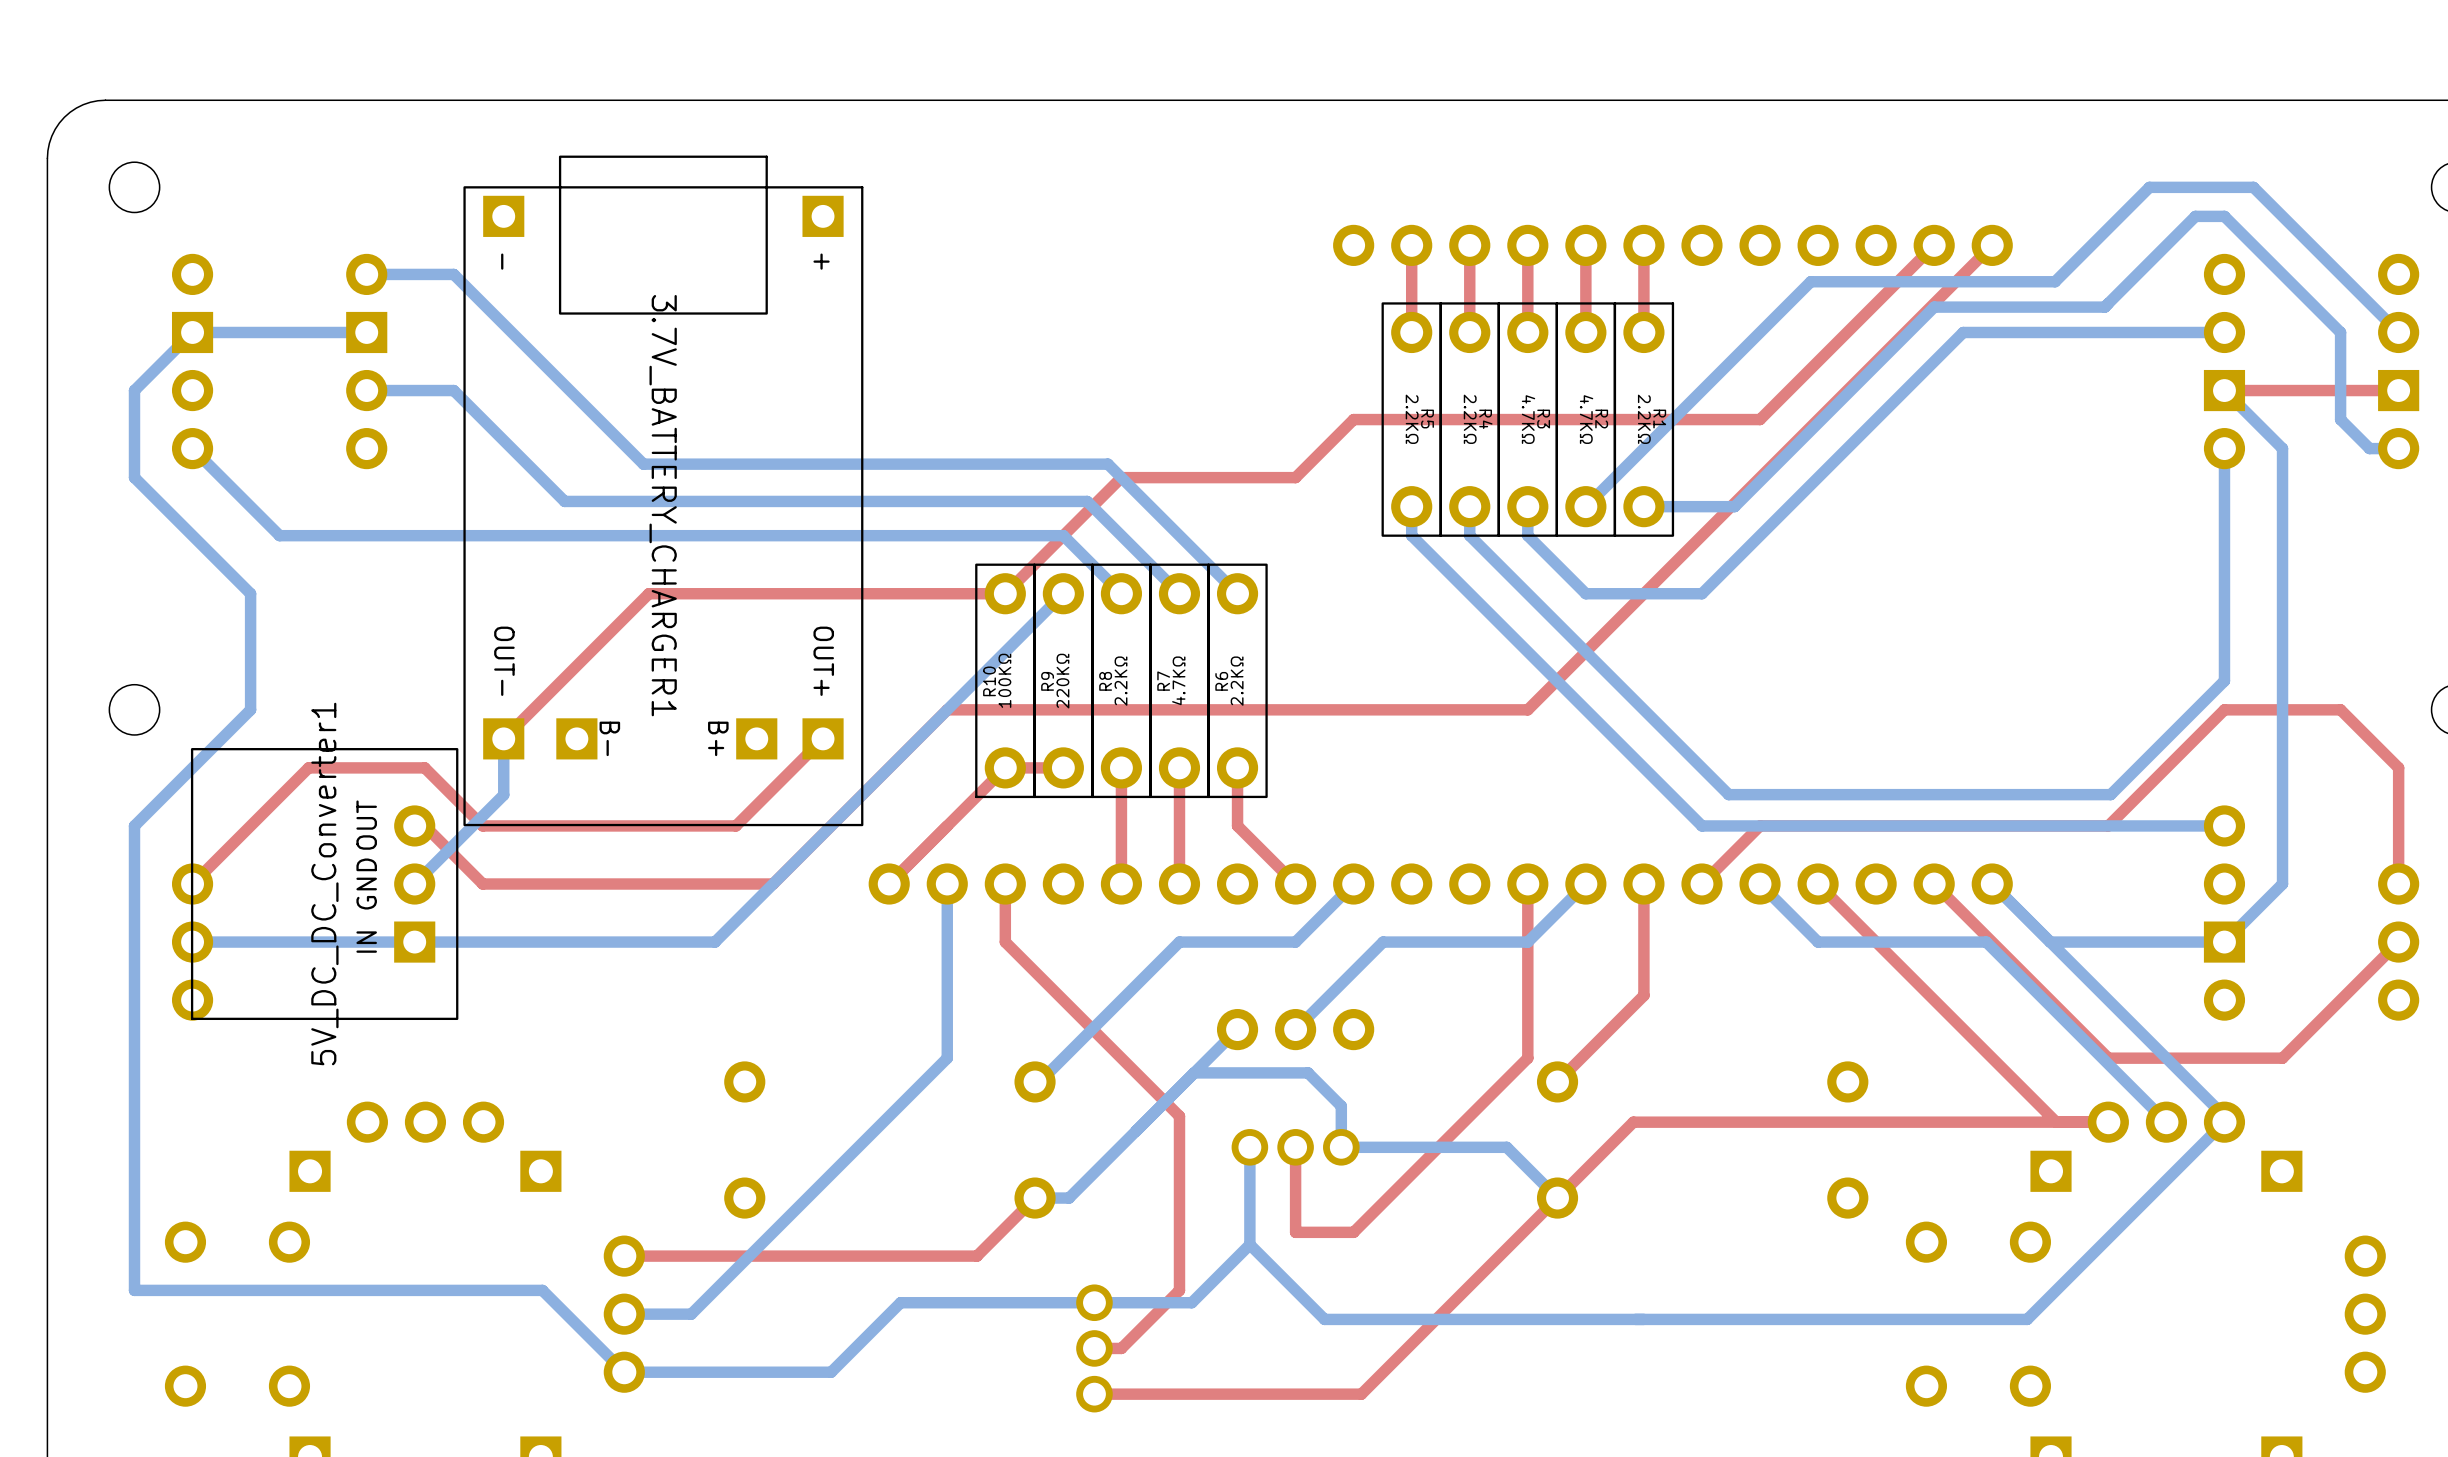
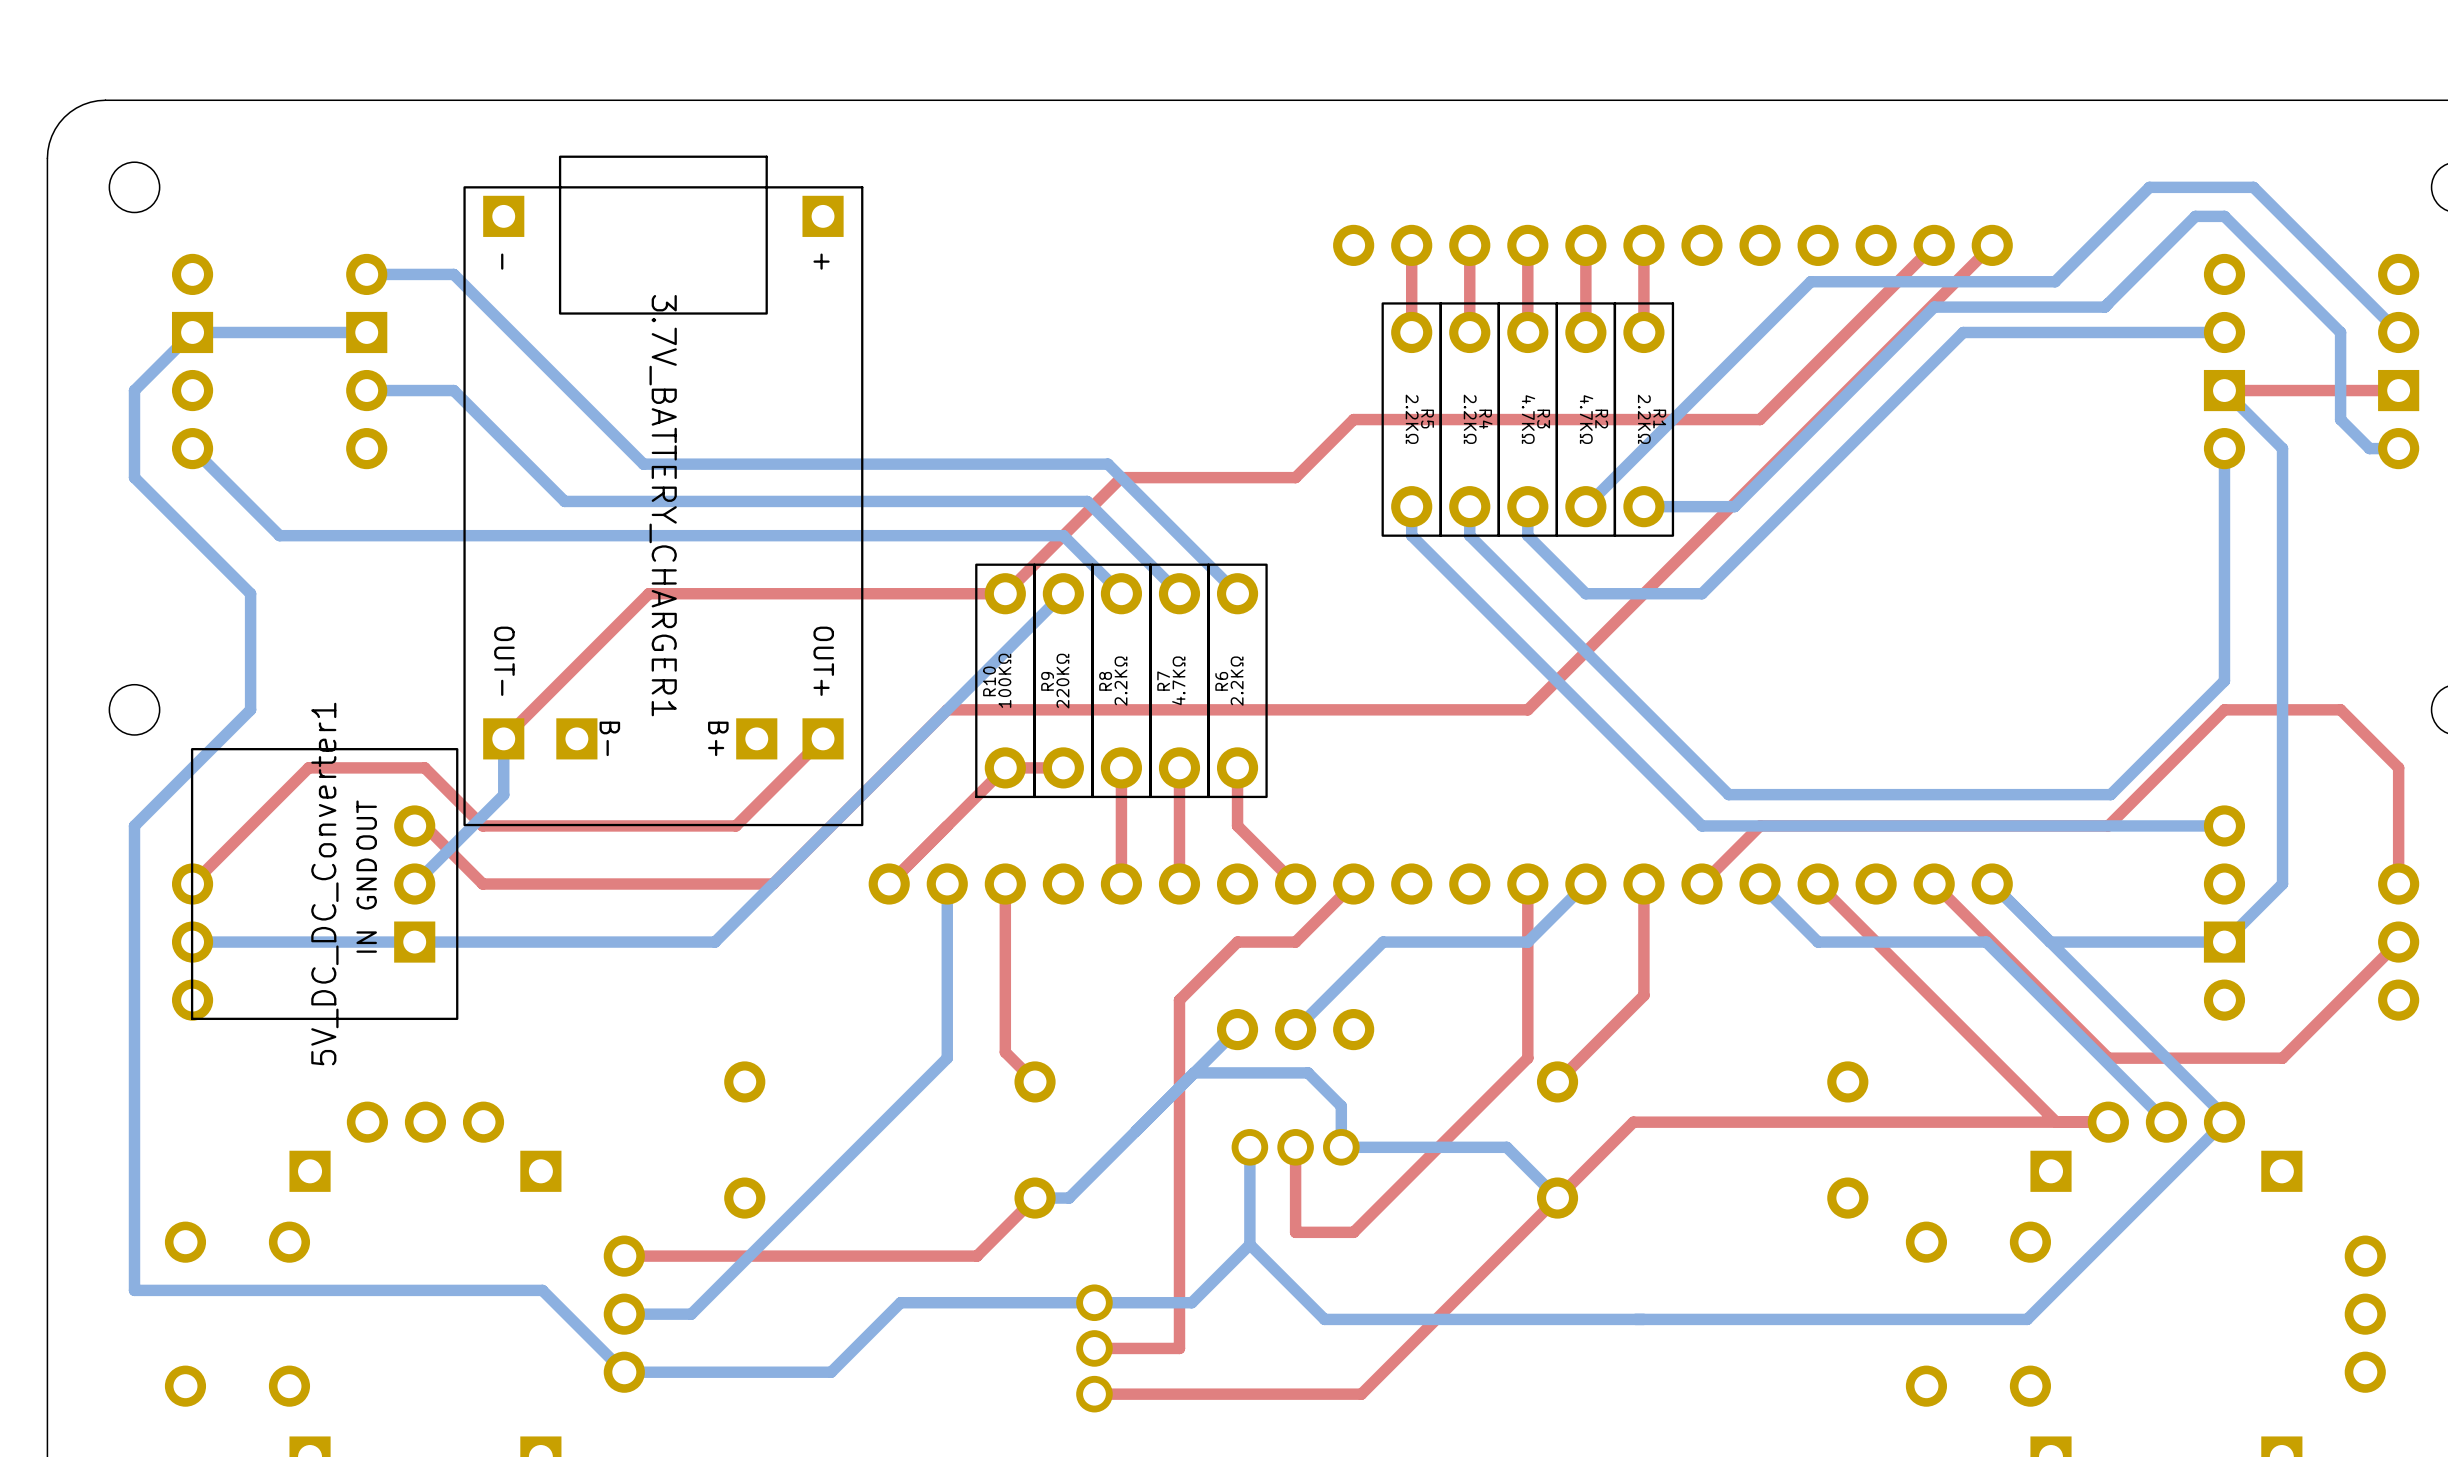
top track: none -> (1353, 884) (1295, 942) (1237, 942) (1179, 1000) (1179, 1116)
bottom track: (1353, 884) (1295, 942) (1179, 942) (1039, 1081) (1035, 1081) -> none
top track: (1005, 942) (1179, 1116) -> (1005, 942) (1005, 1052) (1035, 1081)
top track: (1179, 1290) (1121, 1348) -> (1179, 1290) (1179, 1348) (1121, 1348)

